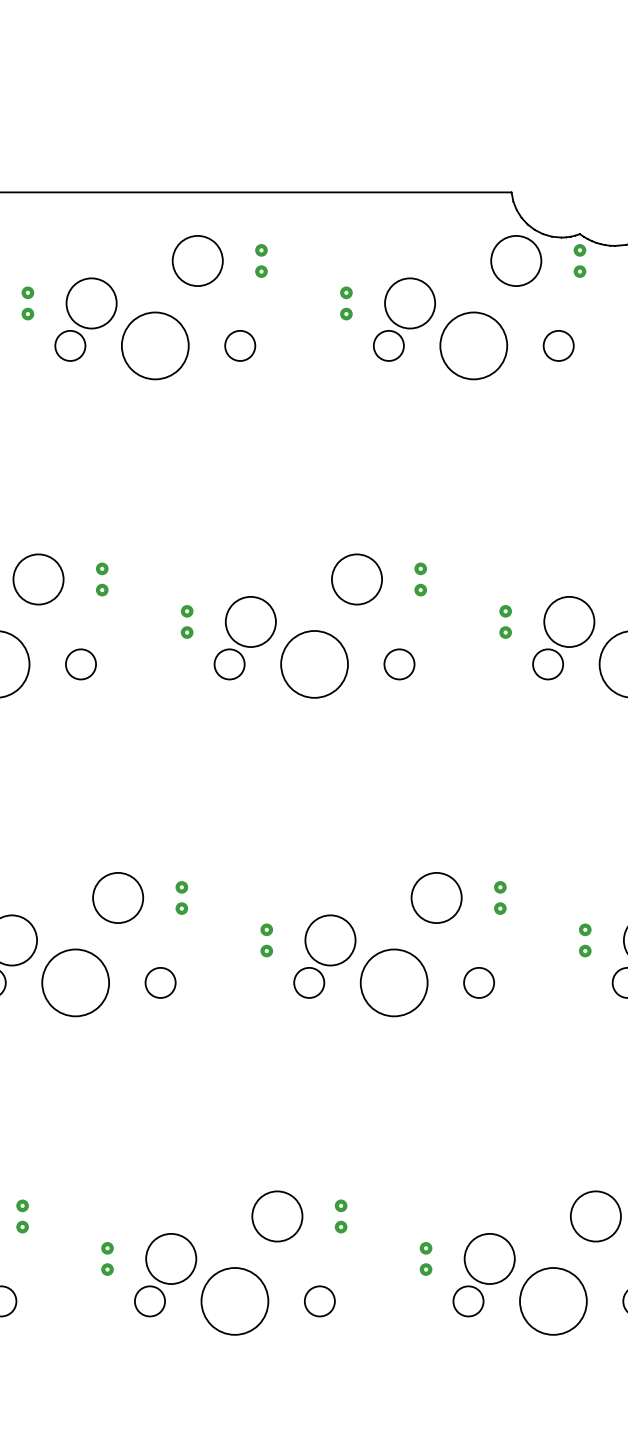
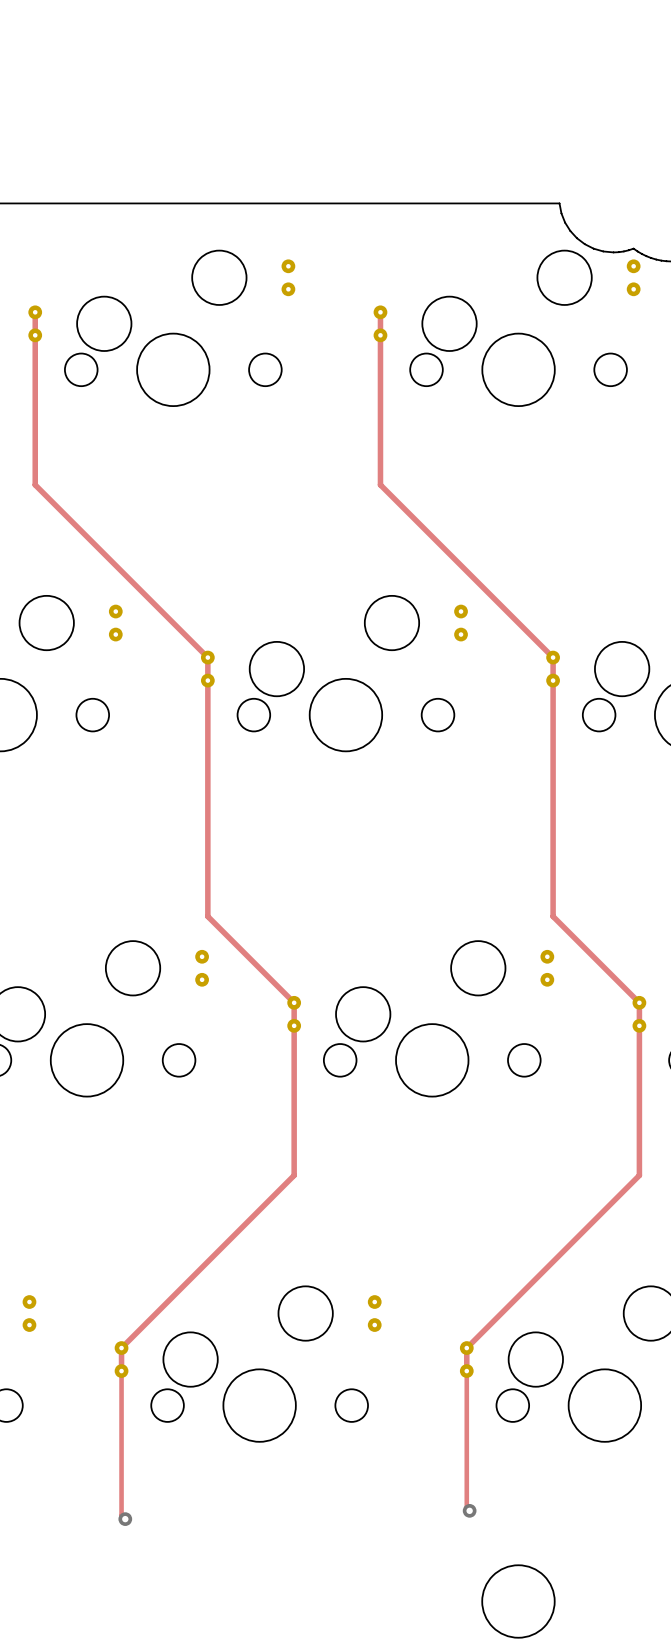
track: none -> (35, 312) (35, 484) (207, 657) (207, 916) (294, 1002) (294, 1175) (121, 1348) (121, 1515) (125, 1519)
track: none -> (380, 312) (380, 484) (553, 657) (553, 916) (639, 1002) (639, 1175) (466, 1348) (466, 1507) (469, 1510)
via: none -> (469, 1510)
via: none -> (125, 1519)

